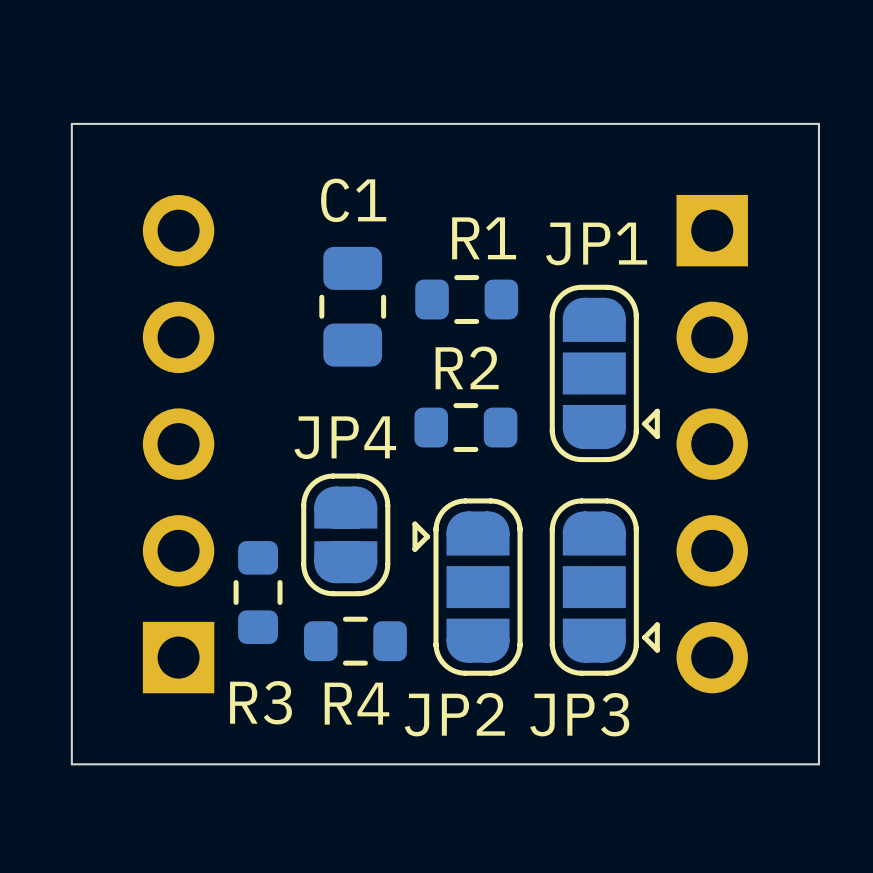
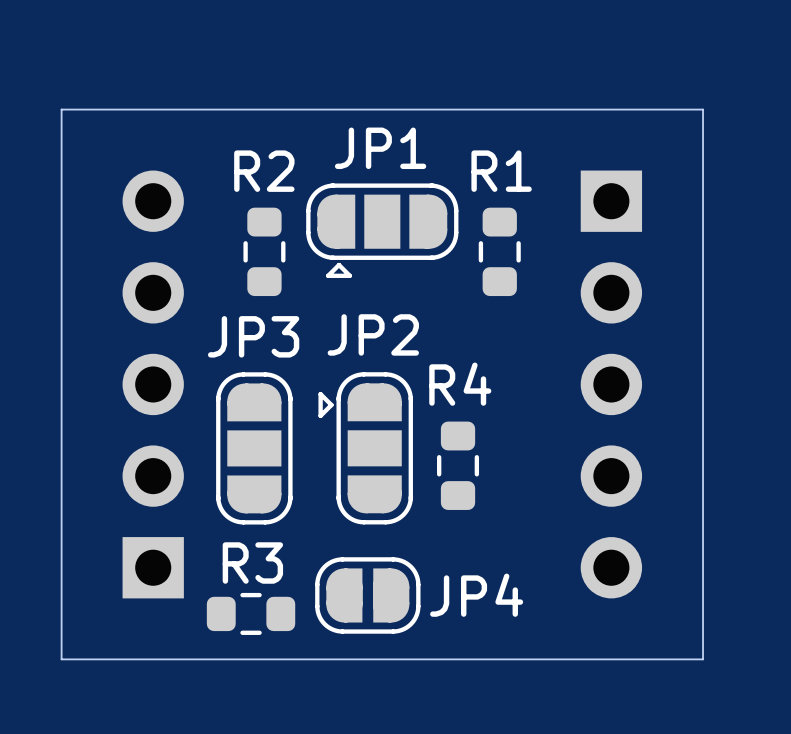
R1 rotation: 0° (466, 299) -> 90° clockwise (499, 251)
R1 position: (466, 299) -> (499, 251)
C1: (352, 306) -> none
JP1 rotation: 0° (604, 373) -> 90° clockwise (382, 230)
JP1 position: (604, 373) -> (382, 230)
R2 rotation: 0° (465, 427) -> 90° clockwise (264, 251)
R2 position: (465, 427) -> (264, 251)
JP3 footprint: [549, 498, 660, 676] -> [216, 372, 293, 525]
JP4 rotation: 0° (345, 534) -> 90° clockwise (367, 595)
JP4 position: (345, 534) -> (367, 595)
JP2 position: (467, 587) -> (365, 448)
R3 rotation: 0° (258, 592) -> 90° clockwise (251, 613)
R3 position: (258, 592) -> (251, 613)
R4 rotation: 0° (355, 641) -> 90° clockwise (458, 465)
R4 position: (355, 641) -> (458, 465)
R3 name position: R3 (260, 702) -> R3 (252, 563)
R4 name position: R4 (356, 703) -> R4 (460, 384)
JP2 name position: JP2 (454, 714) -> JP2 (373, 334)
JP3 name position: JP3 (579, 714) -> JP3 (253, 336)

